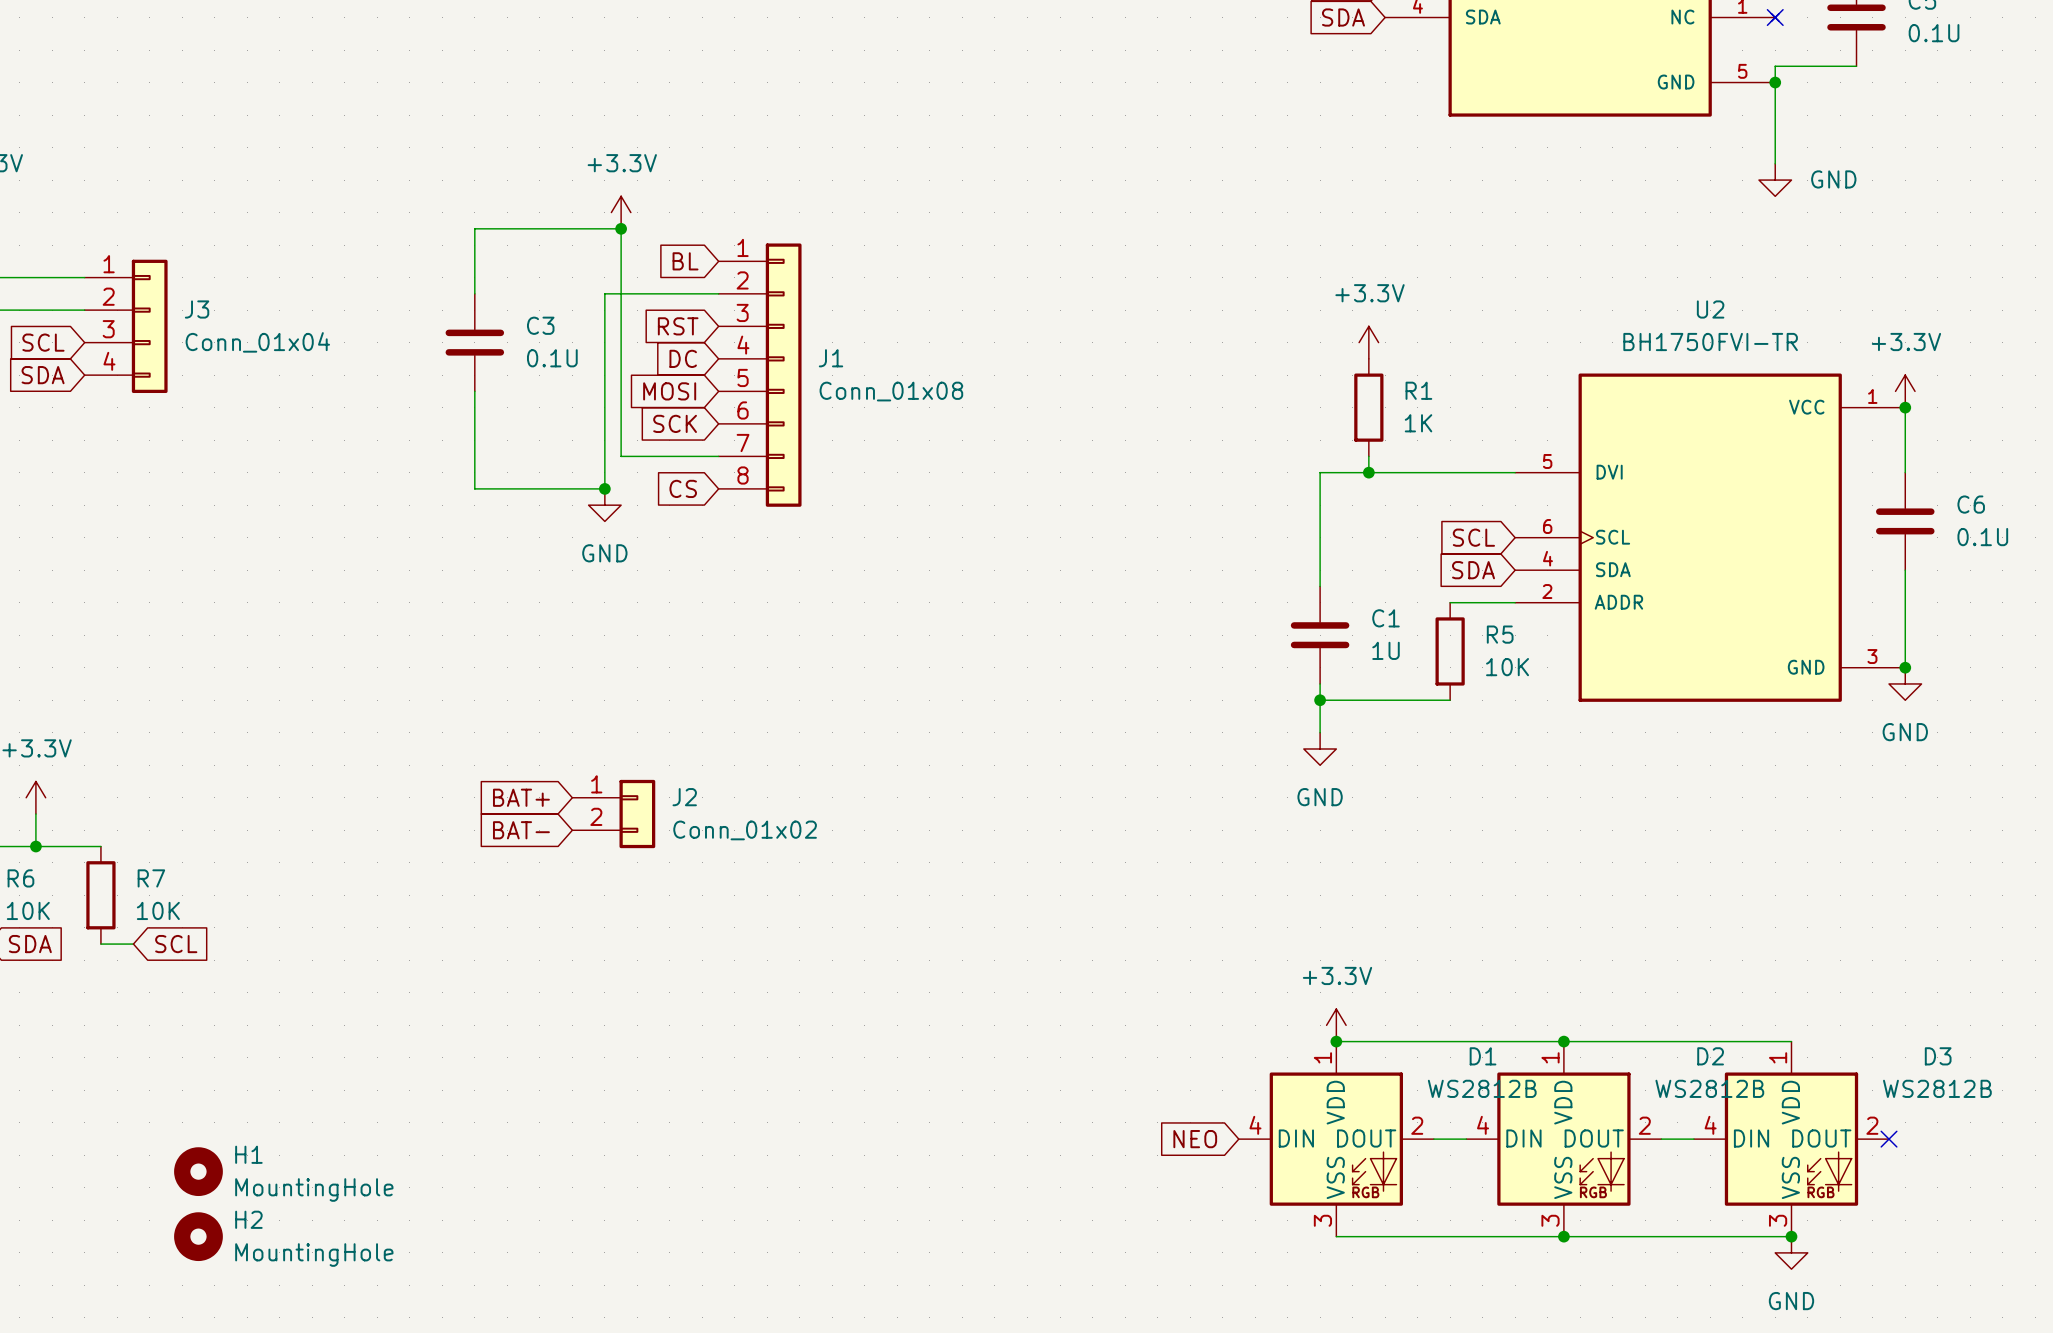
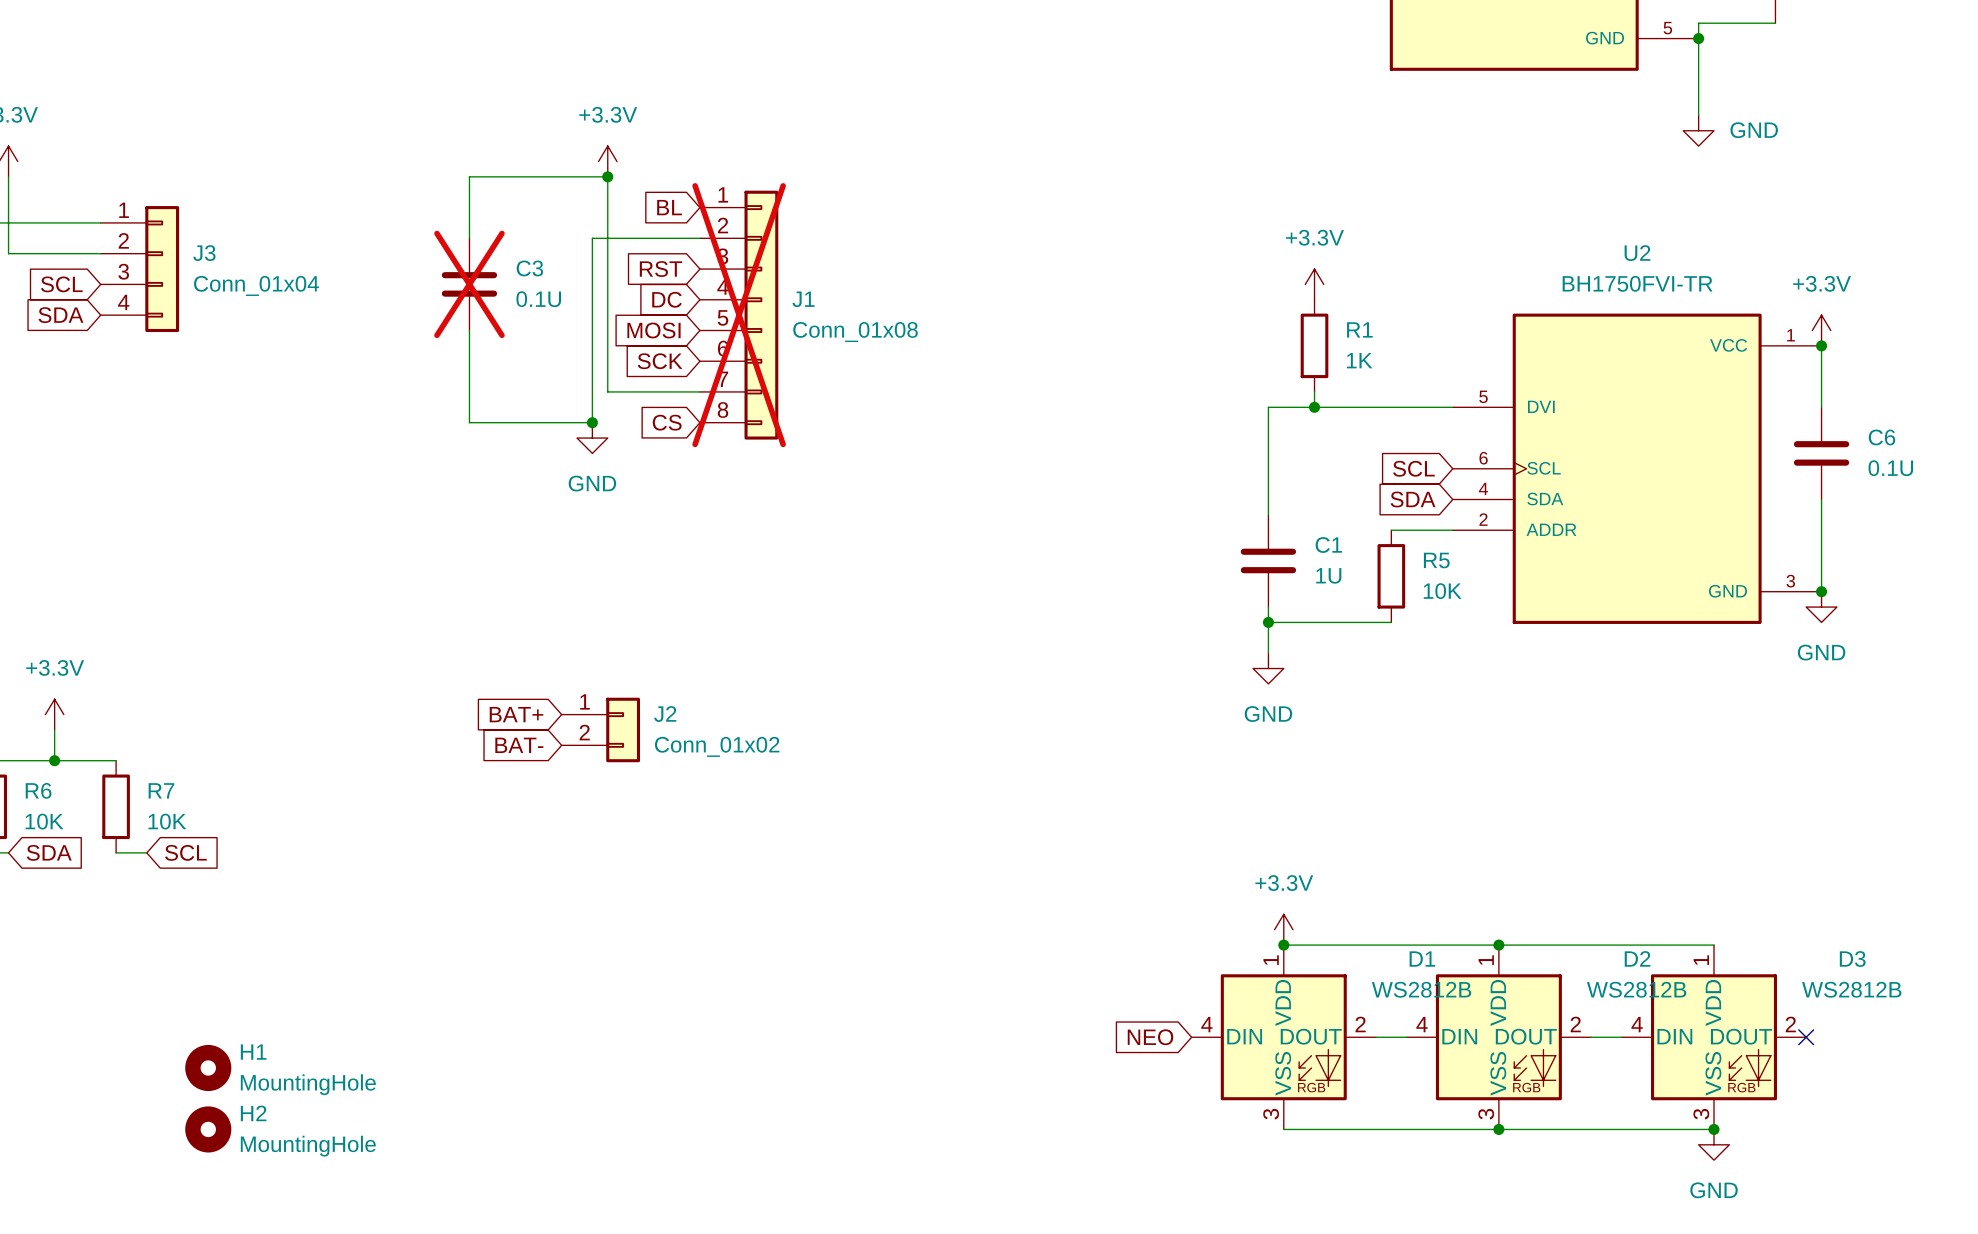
C3 do-not-place cross: none -> (469, 284)
J1 do-not-place cross: none -> (739, 315)

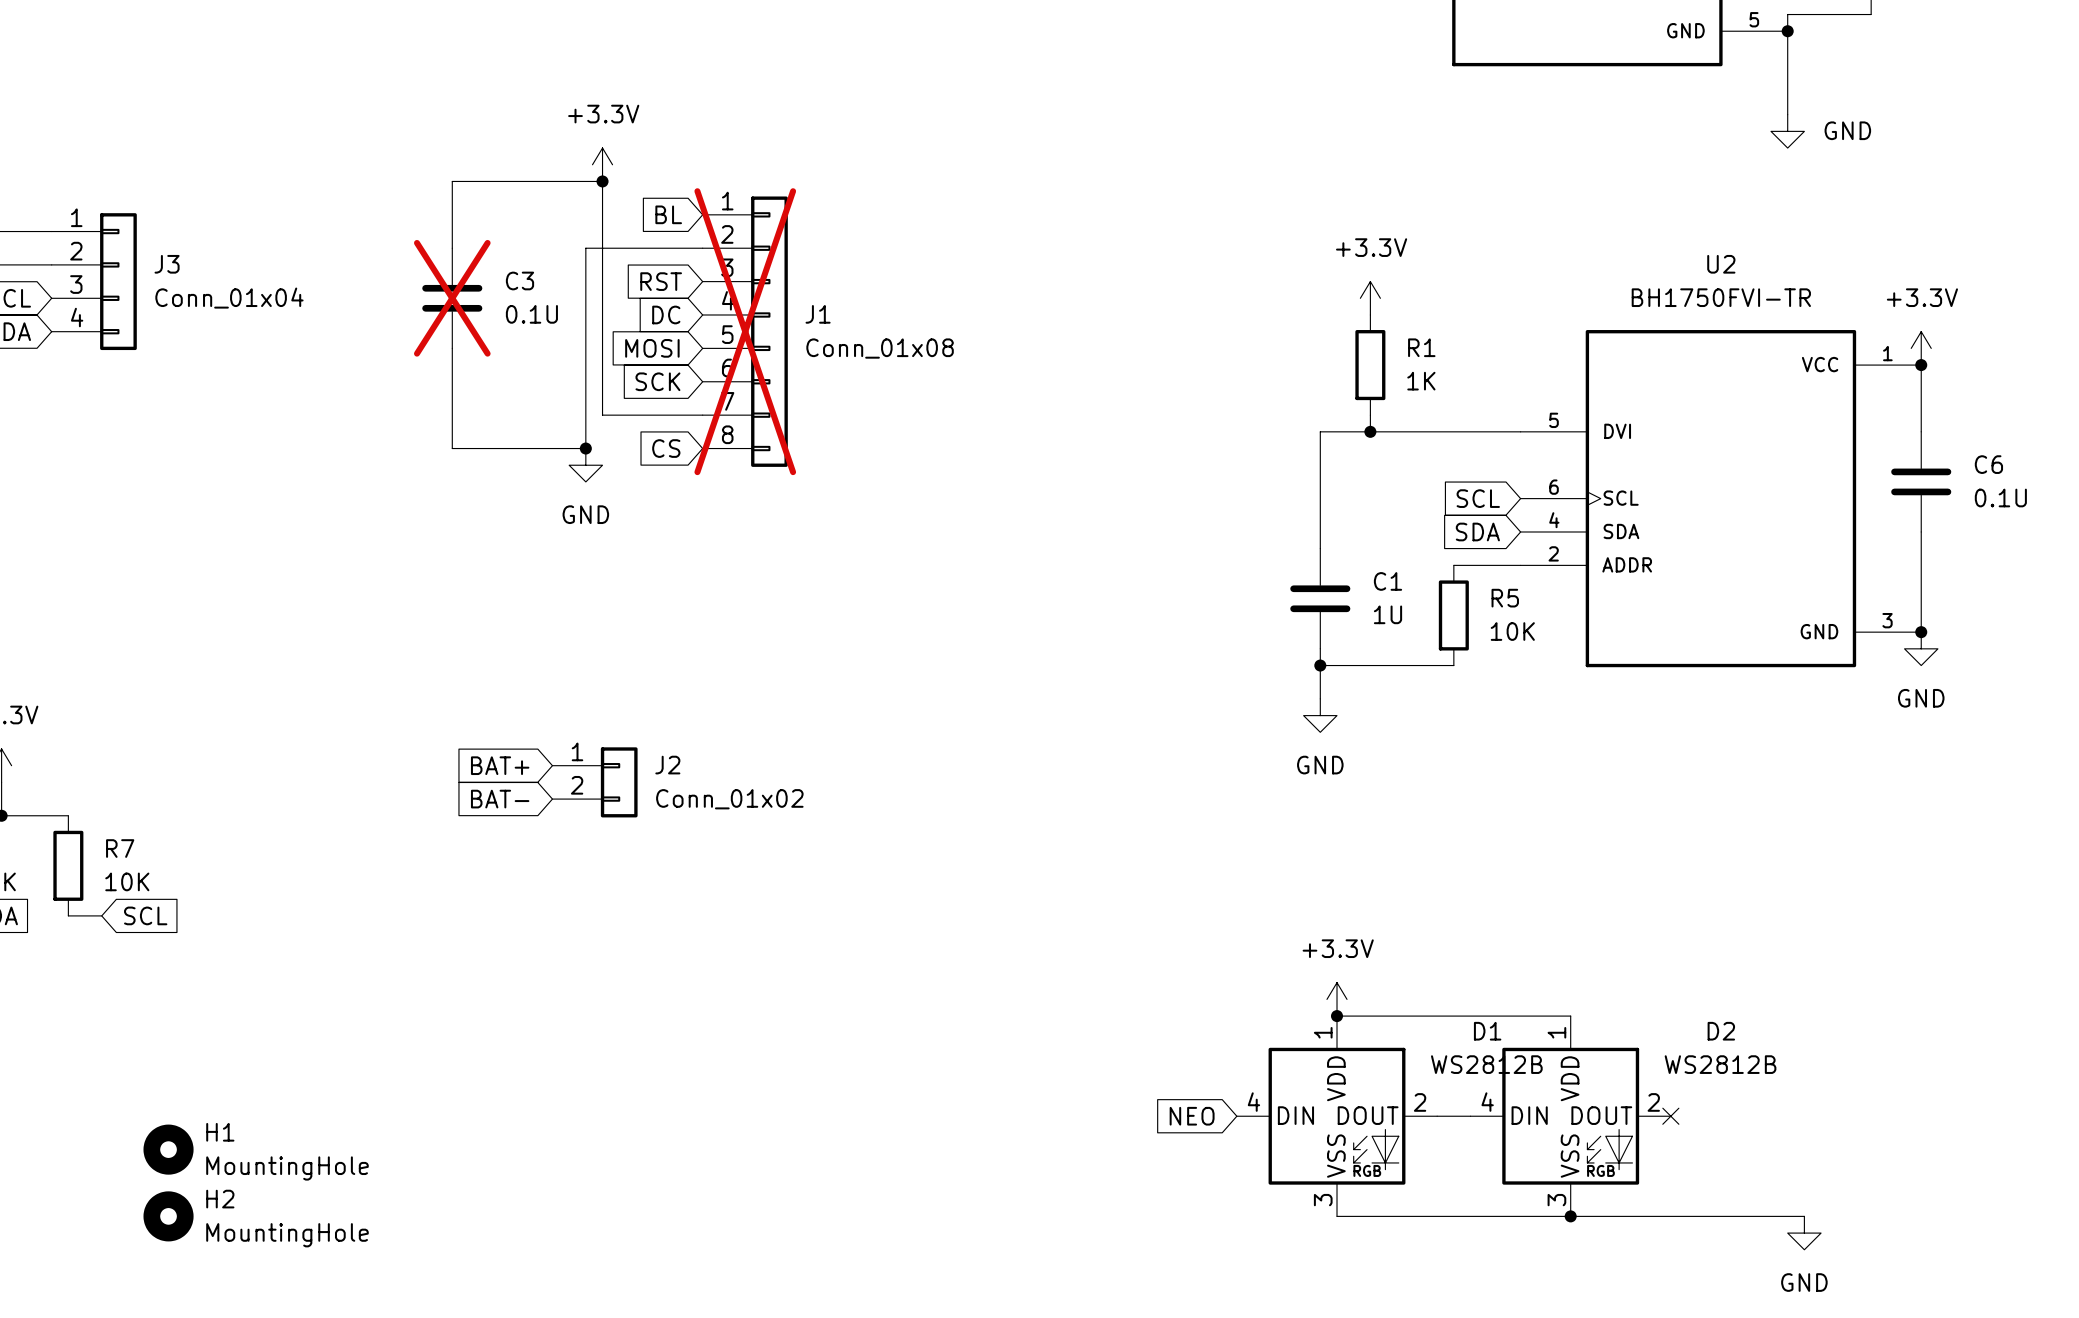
wire: (1498, 945) (1713, 945) -> none
junction: (1498, 945) -> none
wire: (1591, 1037) (1621, 1037) -> none
no-connect mark: none -> (1670, 1116)
D3: WS2812B (1713, 1037) -> none
no-connect mark: (1806, 1037) -> none
junction: (1713, 1129) -> none

